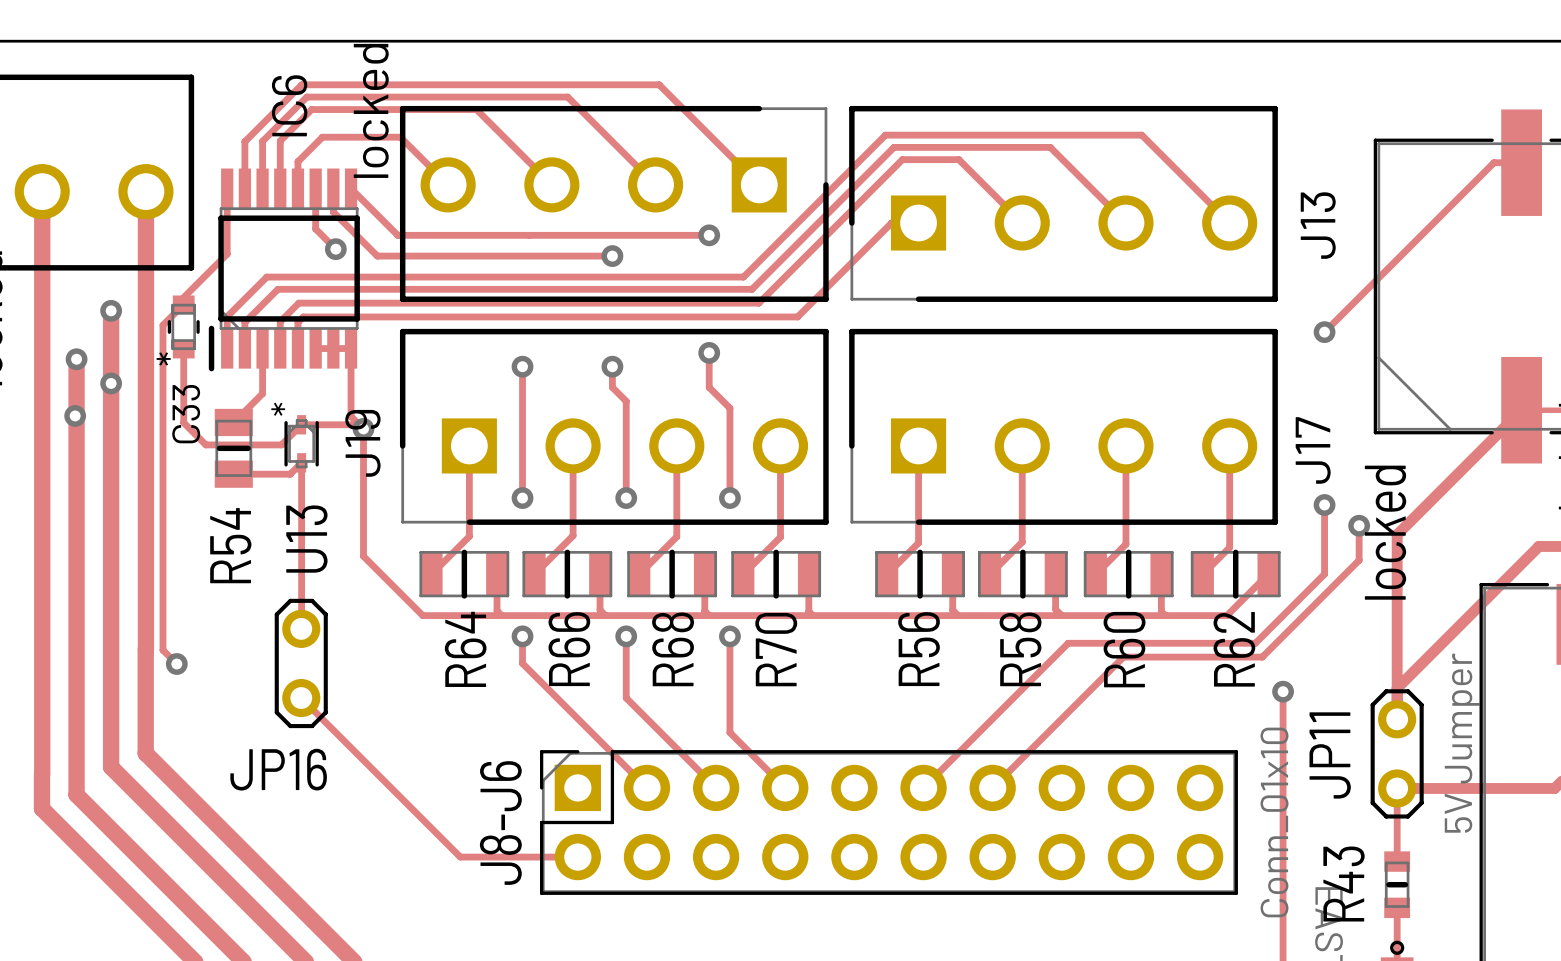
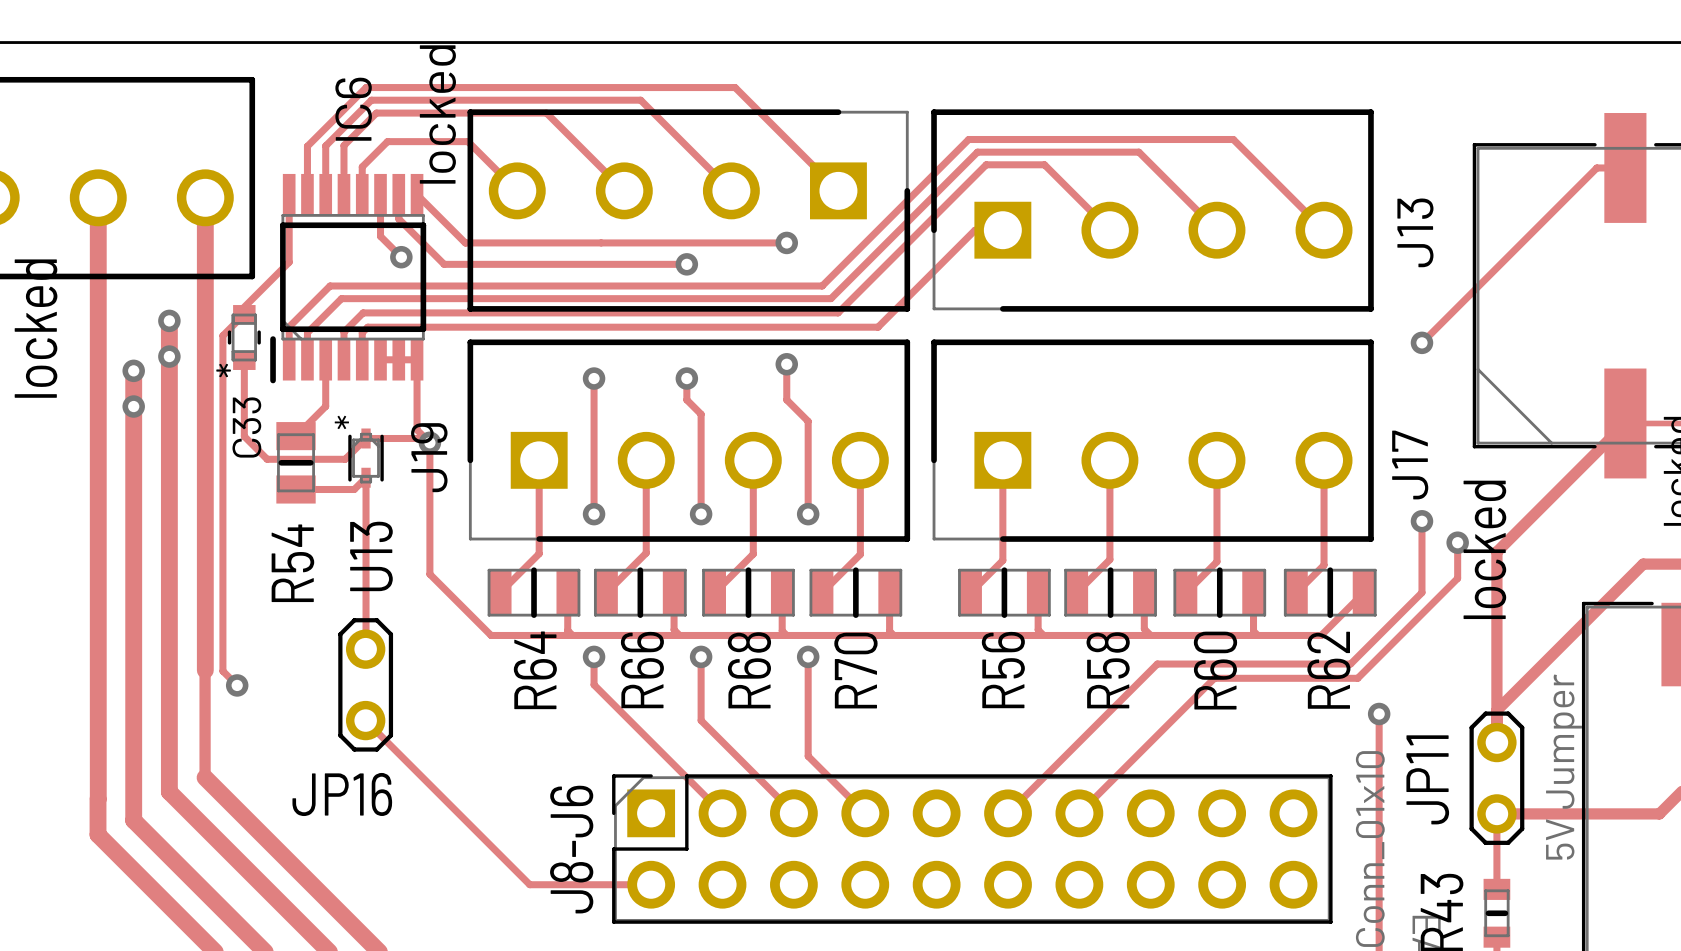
via: none -> (169, 356)
via: (111, 383) -> none
via: none -> (133, 406)
via: (75, 415) -> none
track width: thick (145, 649) (145, 753) -> thin (205, 670) (205, 777)

